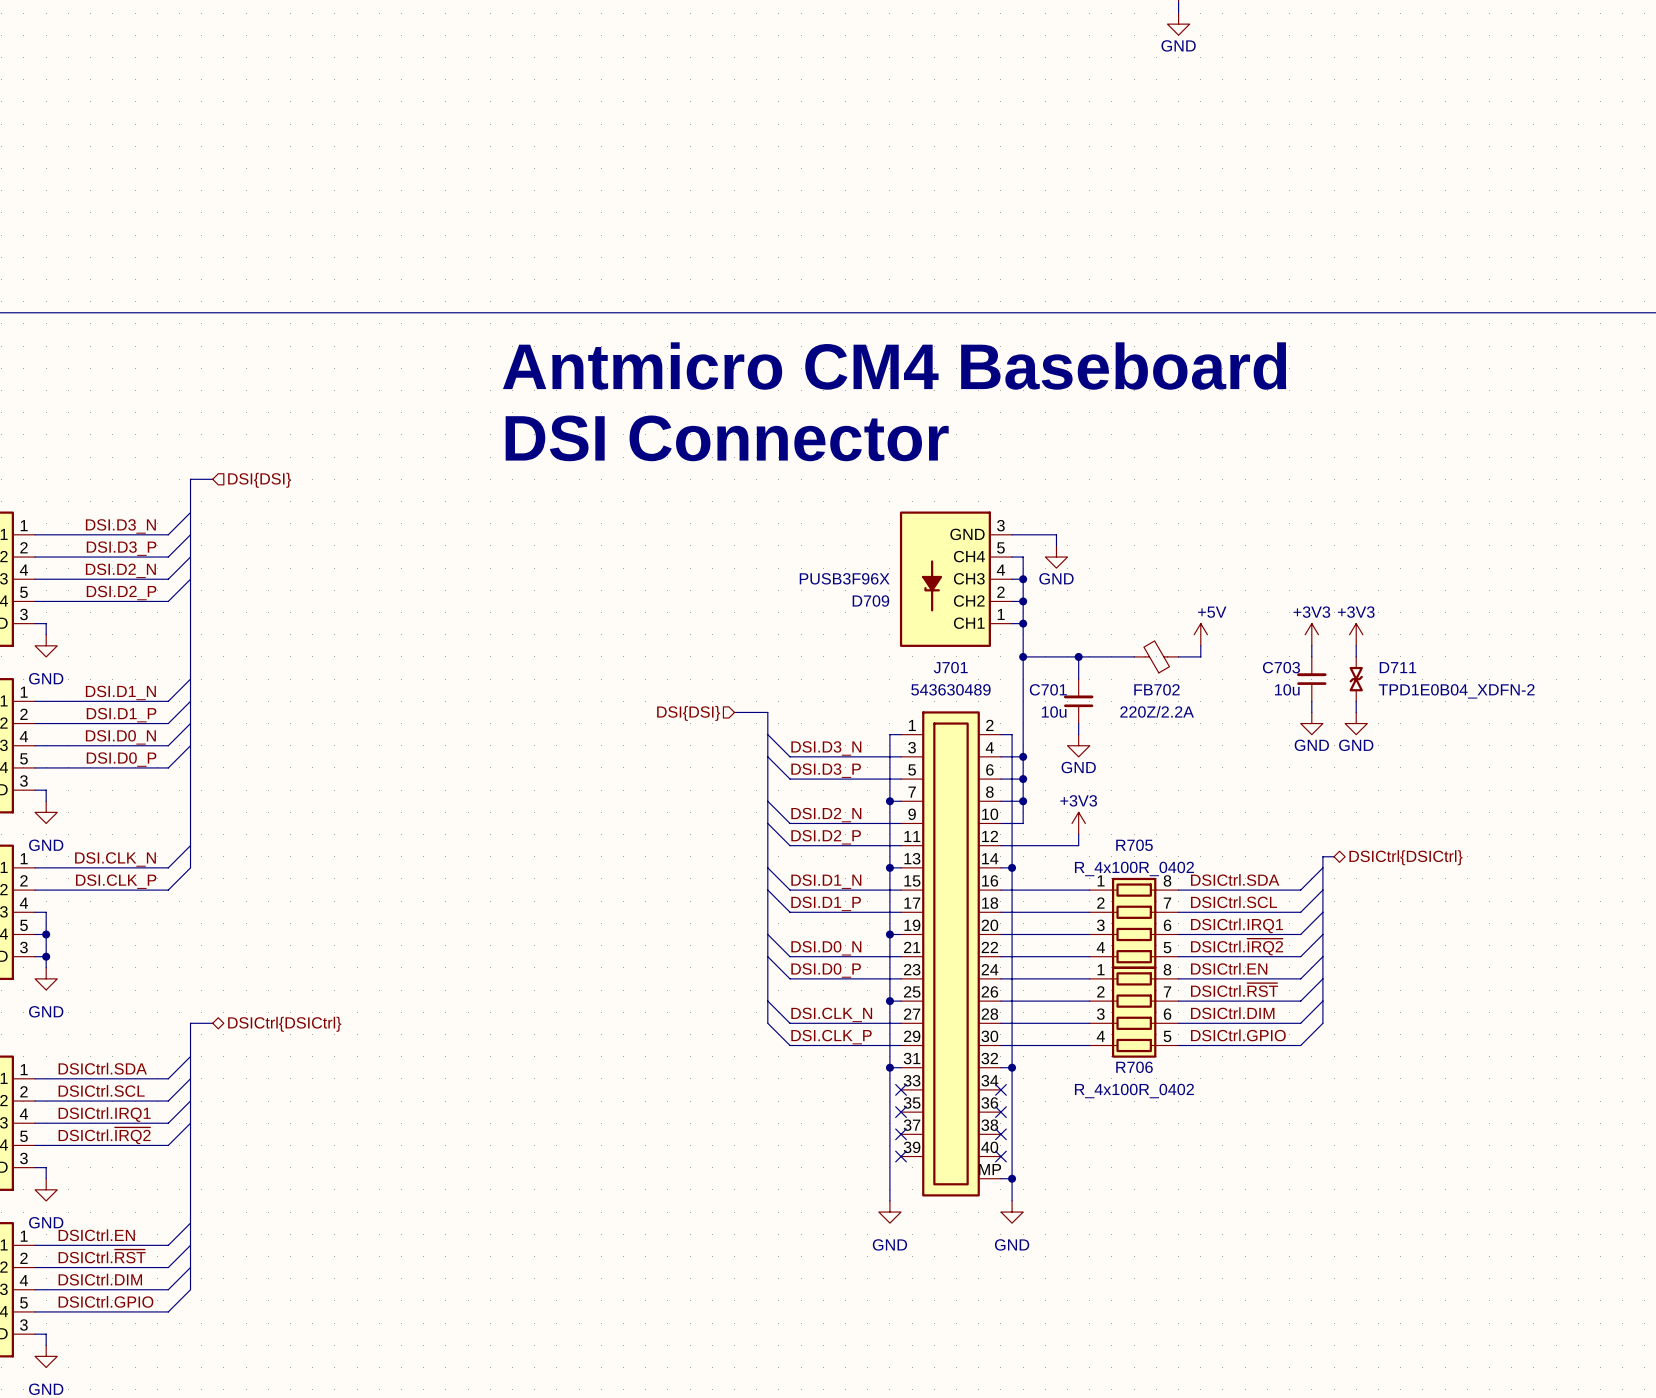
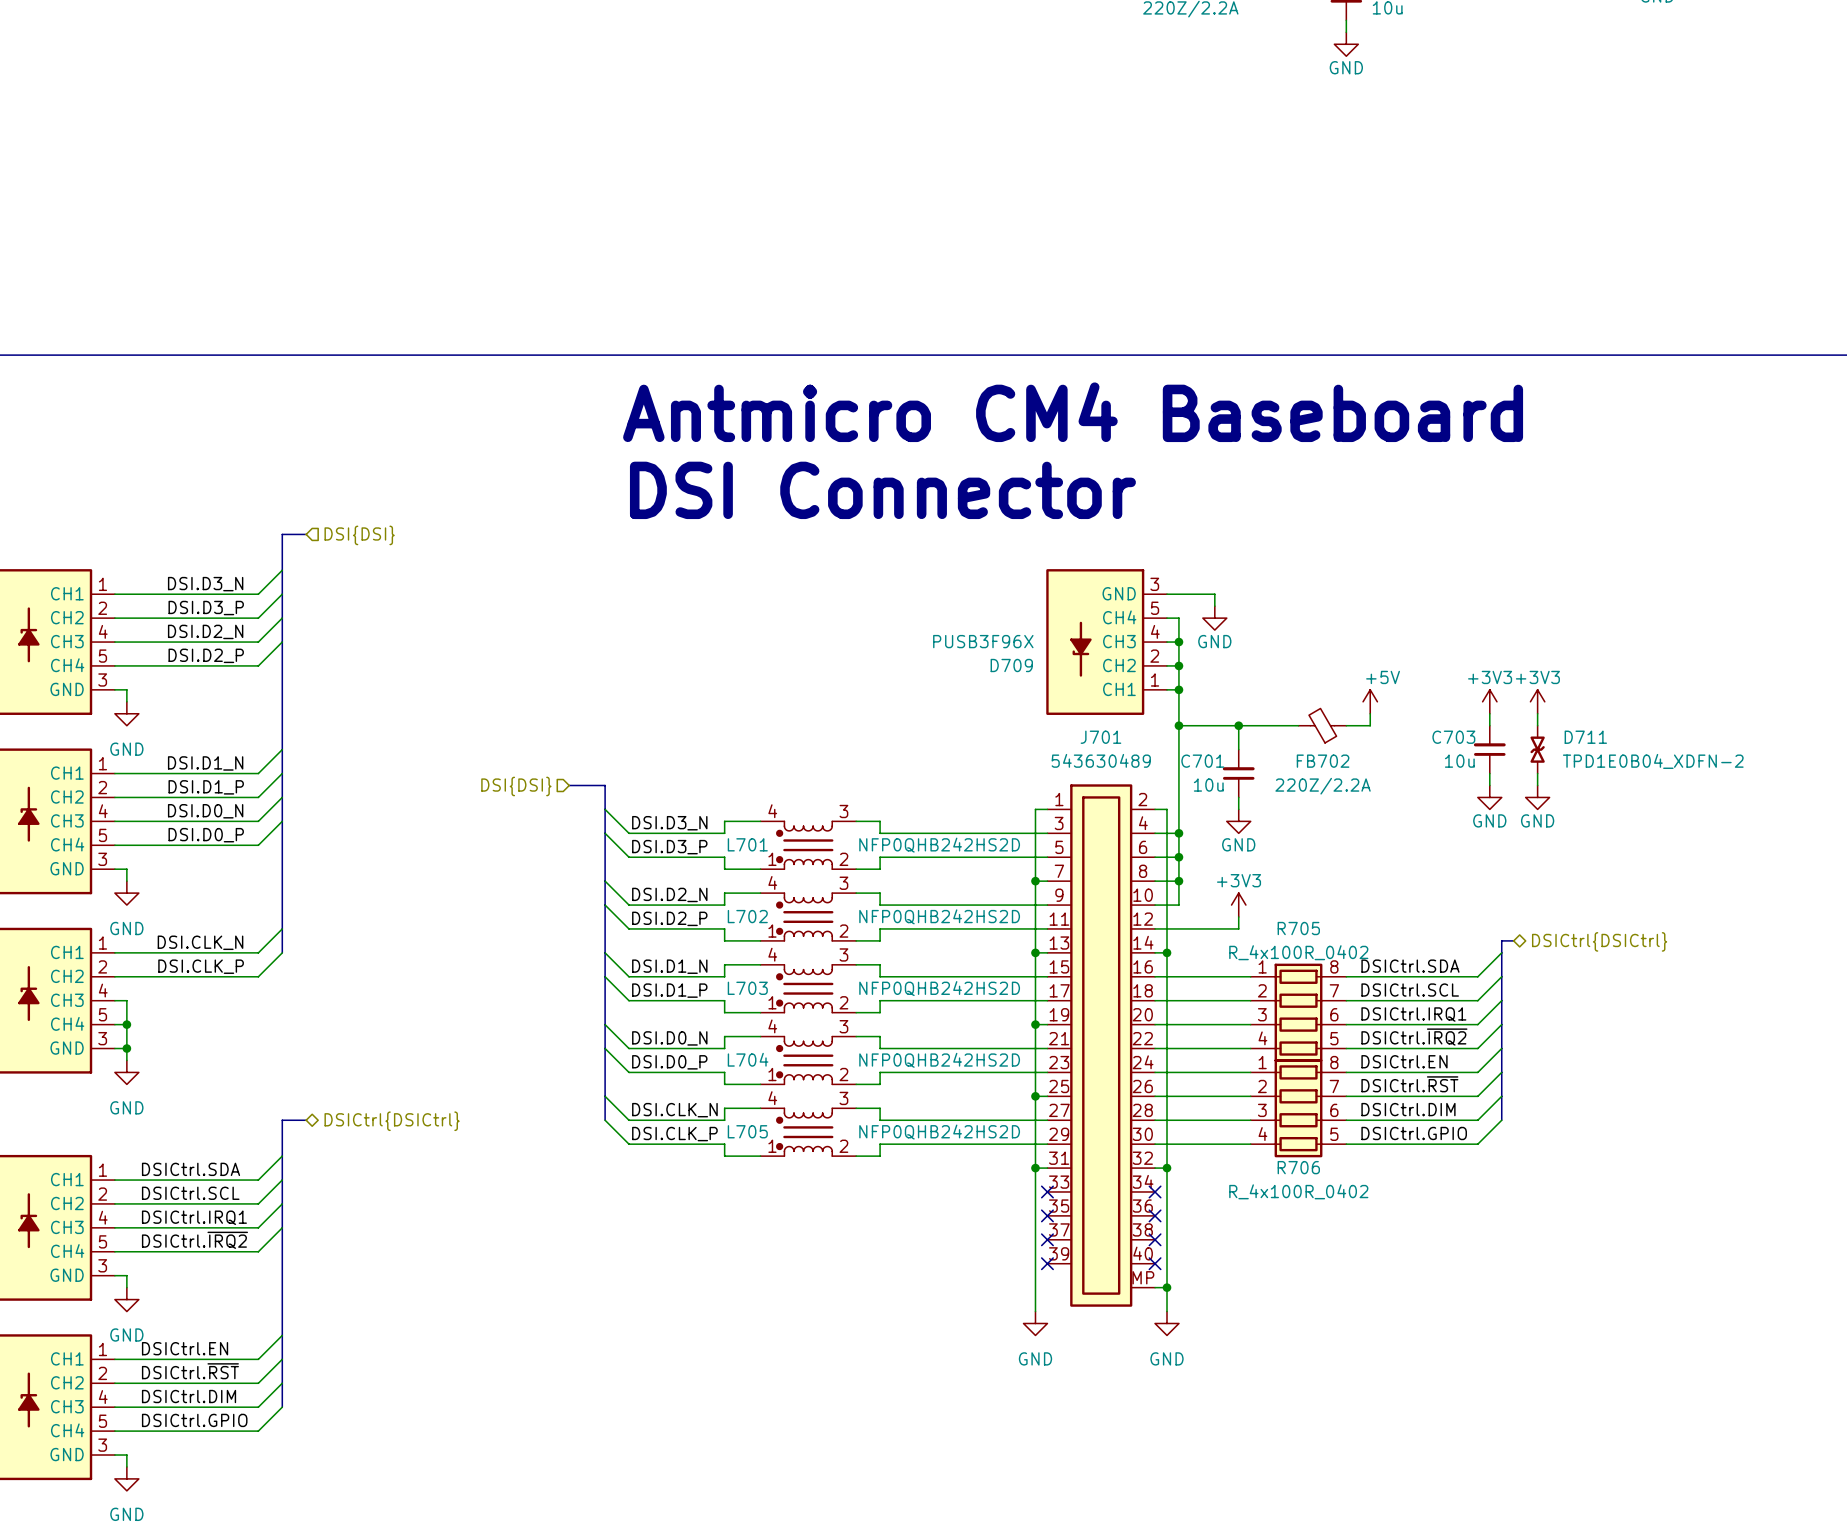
bus: none -> (569, 785) (605, 785) (605, 1120)
bus: (734, 712) (767, 712) (767, 1023) -> none
hierarchical label: none -> DSI{DSI} (516, 786)
hierarchical label: DSI{DSI} (688, 713) -> none
wire: none -> (605, 809) (629, 833) (724, 833) (724, 821) (760, 821)
wire: (767, 734) (790, 756) -> (856, 821) (880, 821) (880, 833) (927, 833)
label: none -> DSI.D3_N (669, 823)
label: DSI.D3_N (826, 748) -> none
wire: none -> (605, 833) (629, 857) (724, 857) (724, 869) (760, 869)
wire: (767, 756) (790, 779) -> (856, 869) (880, 869) (880, 857) (927, 857)
L701: none -> (808, 845)
label: none -> DSI.D3_P (669, 847)
label: DSI.D3_P (826, 770) -> none
wire: none -> (605, 881) (629, 905) (724, 905) (724, 893) (760, 893)
wire: (767, 801) (790, 823) -> (856, 893) (880, 893) (880, 905) (927, 905)
label: none -> DSI.D2_N (669, 894)
label: DSI.D2_N (826, 815) -> none
wire: none -> (605, 905) (629, 928) (724, 928) (724, 940) (760, 940)
wire: (767, 823) (790, 845) -> (856, 940) (880, 940) (880, 928) (927, 928)
L702: none -> (808, 917)
label: none -> DSI.D2_P (669, 918)
label: DSI.D2_P (826, 837) -> none
wire: none -> (605, 952) (629, 976) (724, 976) (724, 964) (760, 964)
wire: (767, 867) (790, 890) -> (856, 964) (880, 964) (880, 976) (927, 976)
label: none -> DSI.D1_N (669, 966)
label: DSI.D1_N (826, 881) -> none
wire: none -> (605, 976) (629, 1000) (724, 1000) (724, 1012) (760, 1012)
wire: (767, 890) (790, 912) -> (856, 1012) (880, 1012) (880, 1000) (927, 1000)
L703: none -> (808, 988)
label: none -> DSI.D1_P (669, 990)
label: DSI.D1_P (826, 903) -> none
wire: none -> (605, 1024) (629, 1048) (724, 1048) (724, 1036) (760, 1036)
wire: (767, 934) (790, 956) -> (856, 1036) (880, 1036) (880, 1048) (927, 1048)
label: none -> DSI.D0_N (669, 1038)
label: DSI.D0_N (826, 948) -> none
wire: none -> (605, 1048) (629, 1072) (724, 1072) (724, 1084) (760, 1084)
wire: (767, 956) (790, 978) -> (856, 1084) (880, 1084) (880, 1072) (927, 1072)
L704: none -> (808, 1060)
label: none -> DSI.D0_P (669, 1062)
label: DSI.D0_P (826, 970) -> none
wire: none -> (605, 1096) (629, 1120) (724, 1120) (724, 1108) (760, 1108)
wire: (767, 1001) (790, 1023) -> (856, 1108) (880, 1108) (880, 1120) (927, 1120)
label: none -> DSI.CLK_N (674, 1110)
label: DSI.CLK_N (831, 1014) -> none
wire: none -> (605, 1120) (629, 1144) (724, 1144) (724, 1156) (760, 1156)
wire: (767, 1023) (790, 1045) -> (856, 1156) (880, 1156) (880, 1144) (927, 1144)
L705: none -> (808, 1132)
label: none -> DSI.CLK_P (674, 1134)
label: DSI.CLK_P (831, 1037) -> none

